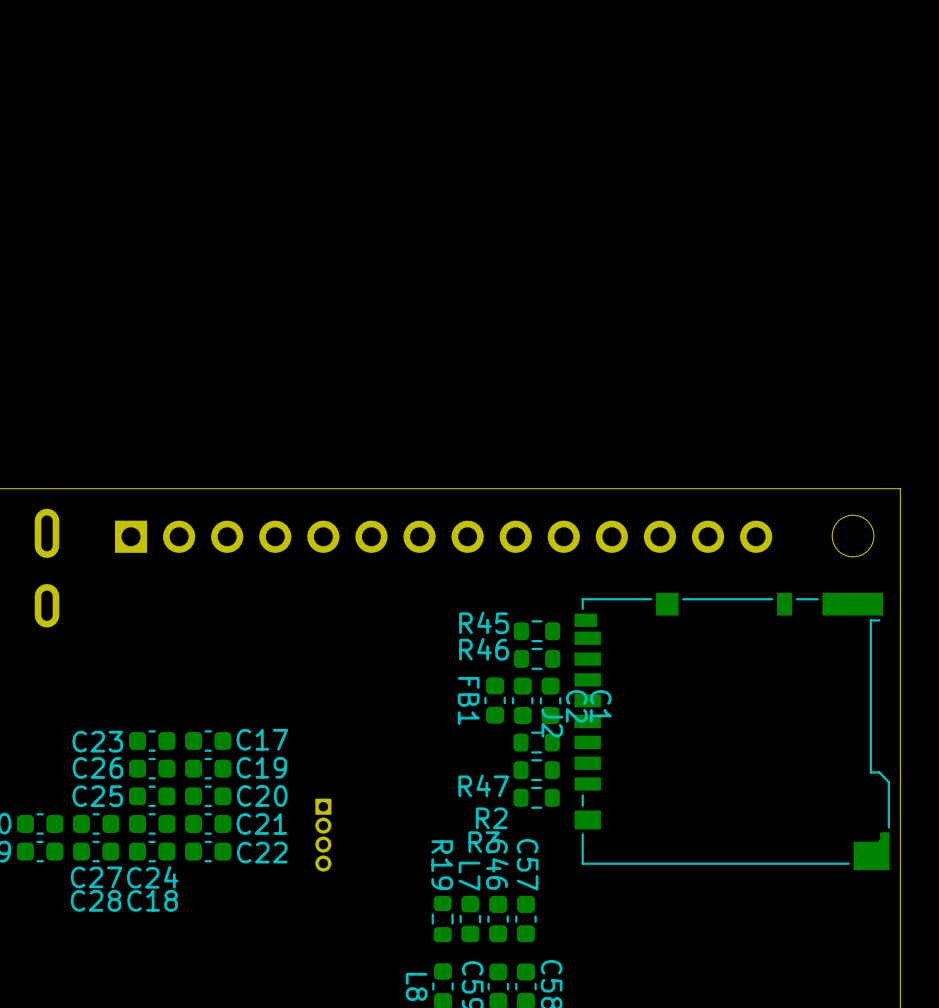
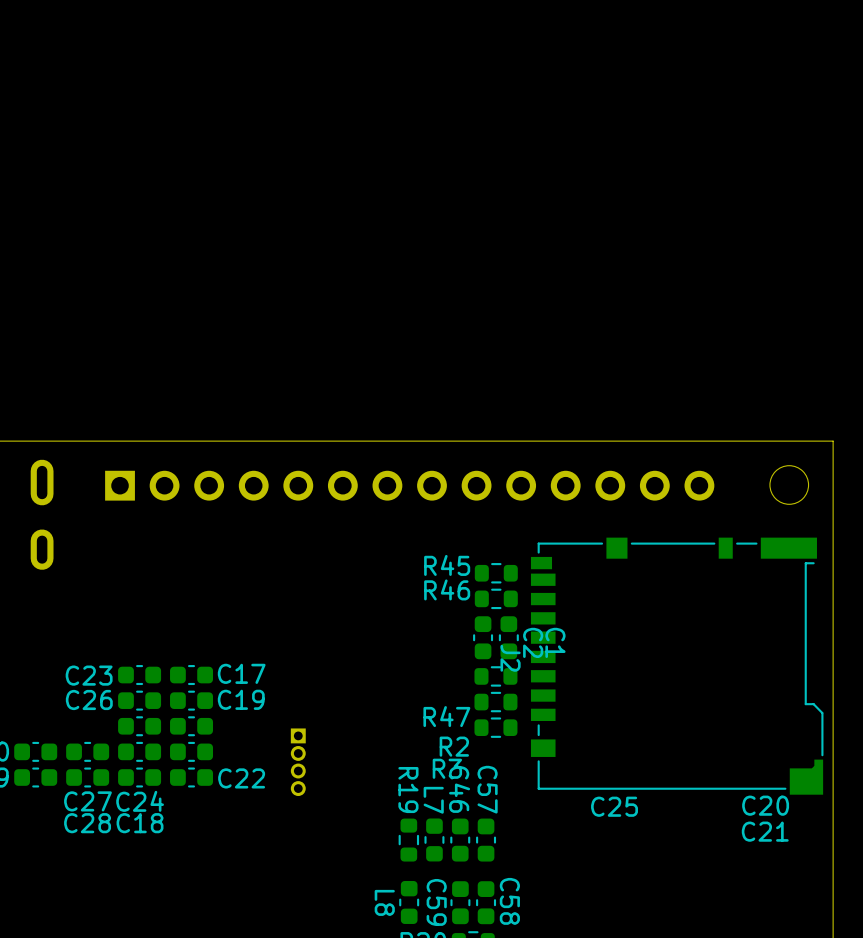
FB1: (495, 700) -> none
C20 name position: C20 (262, 795) -> C20 (765, 805)
C25 name position: C25 (97, 796) -> C25 (614, 806)
C21 name position: C21 (261, 824) -> C21 (765, 831)

